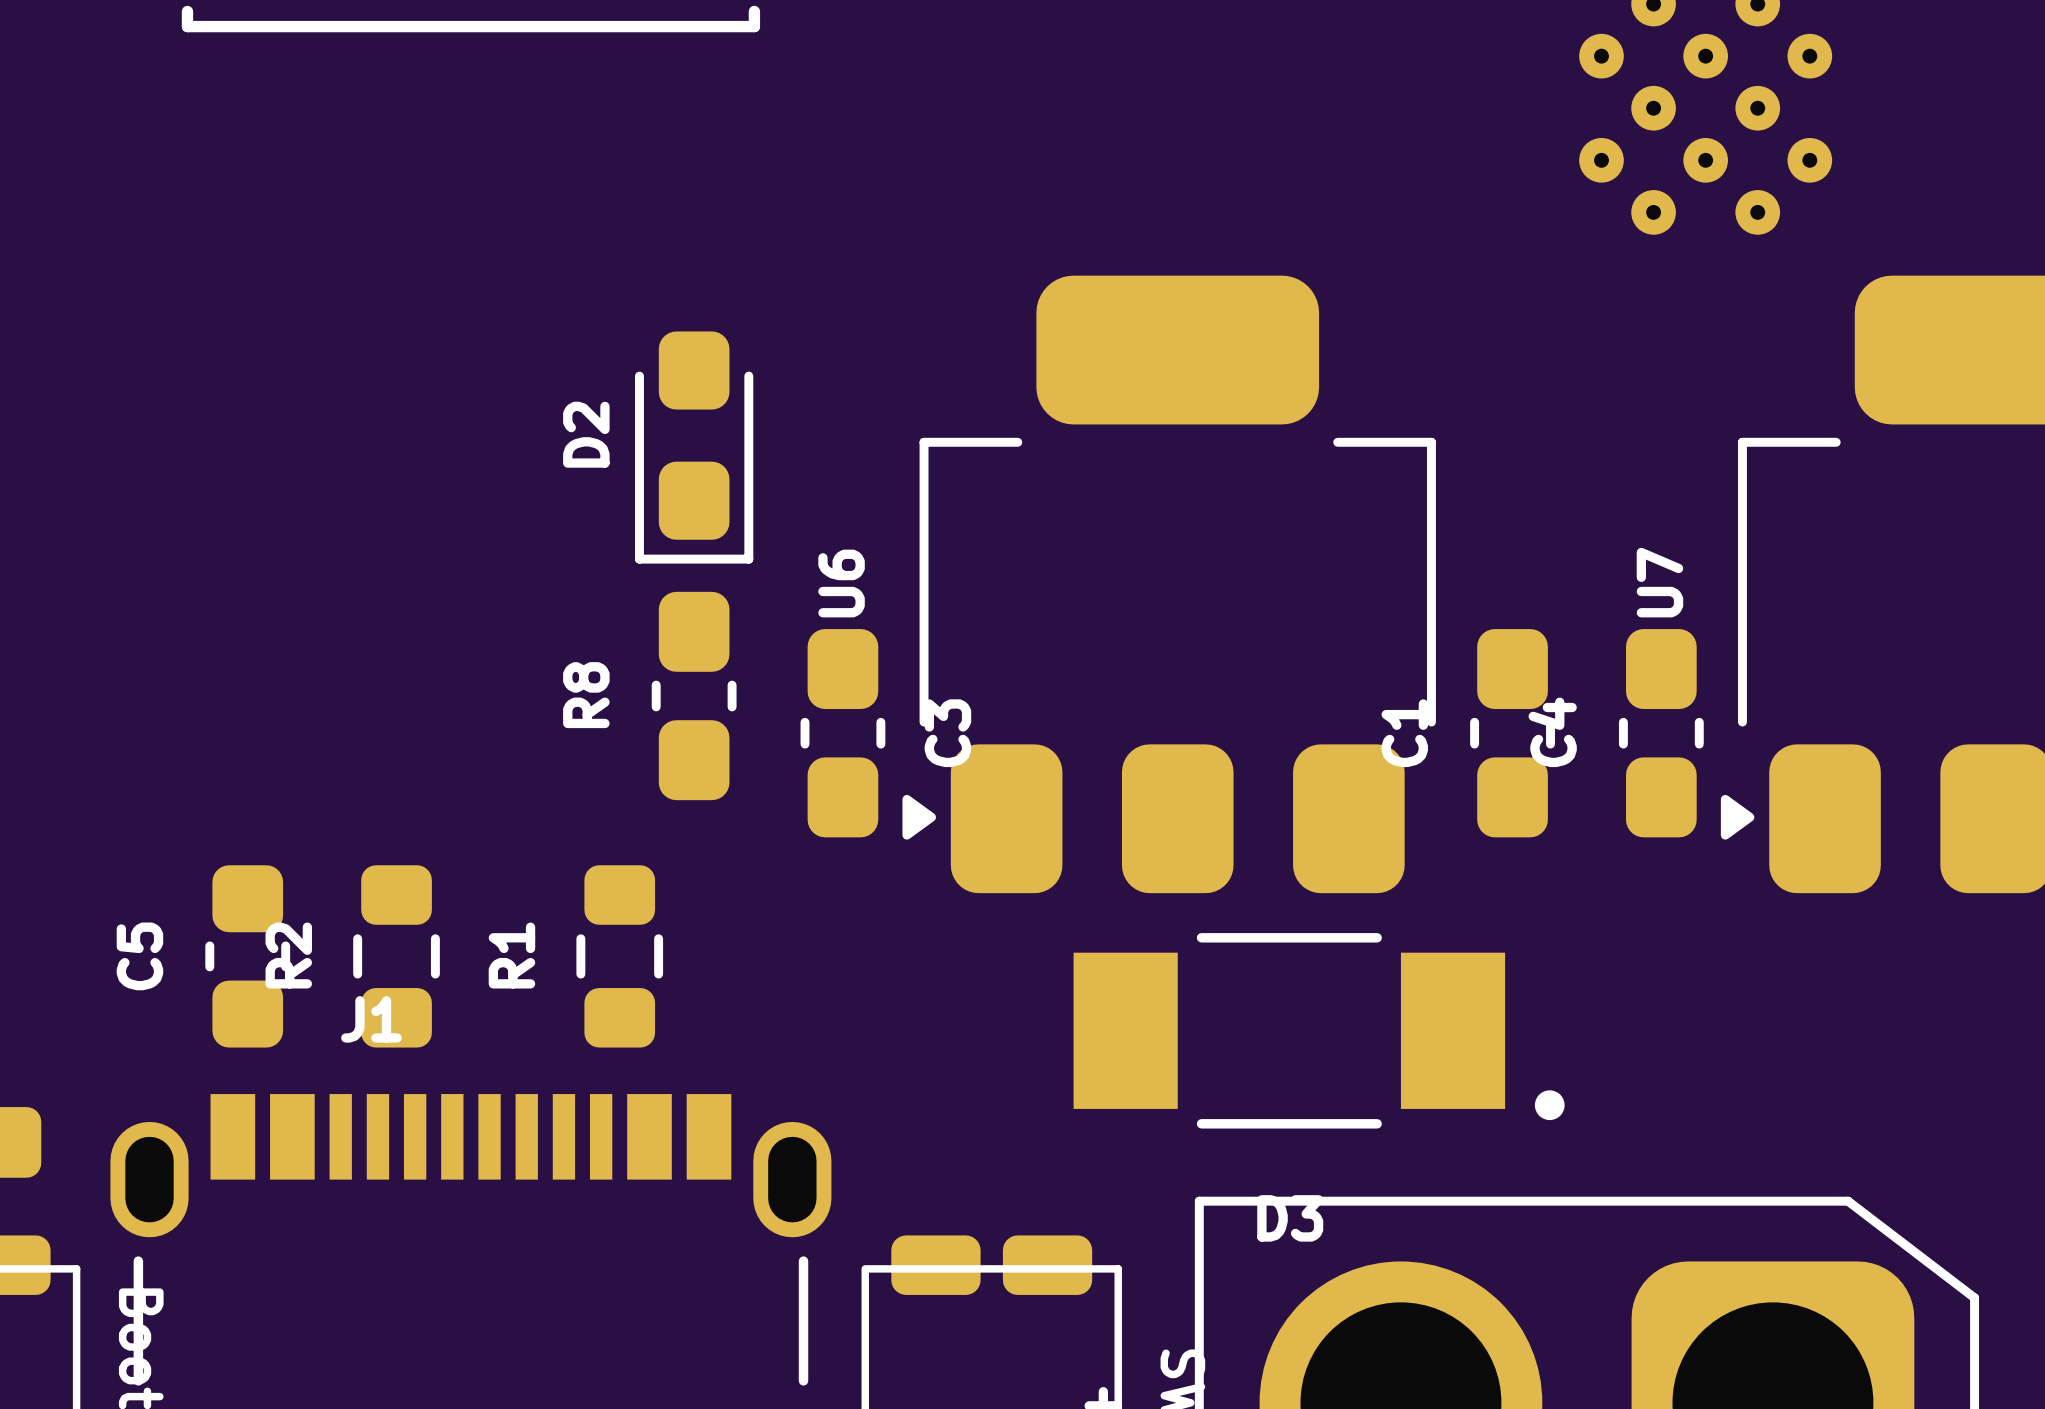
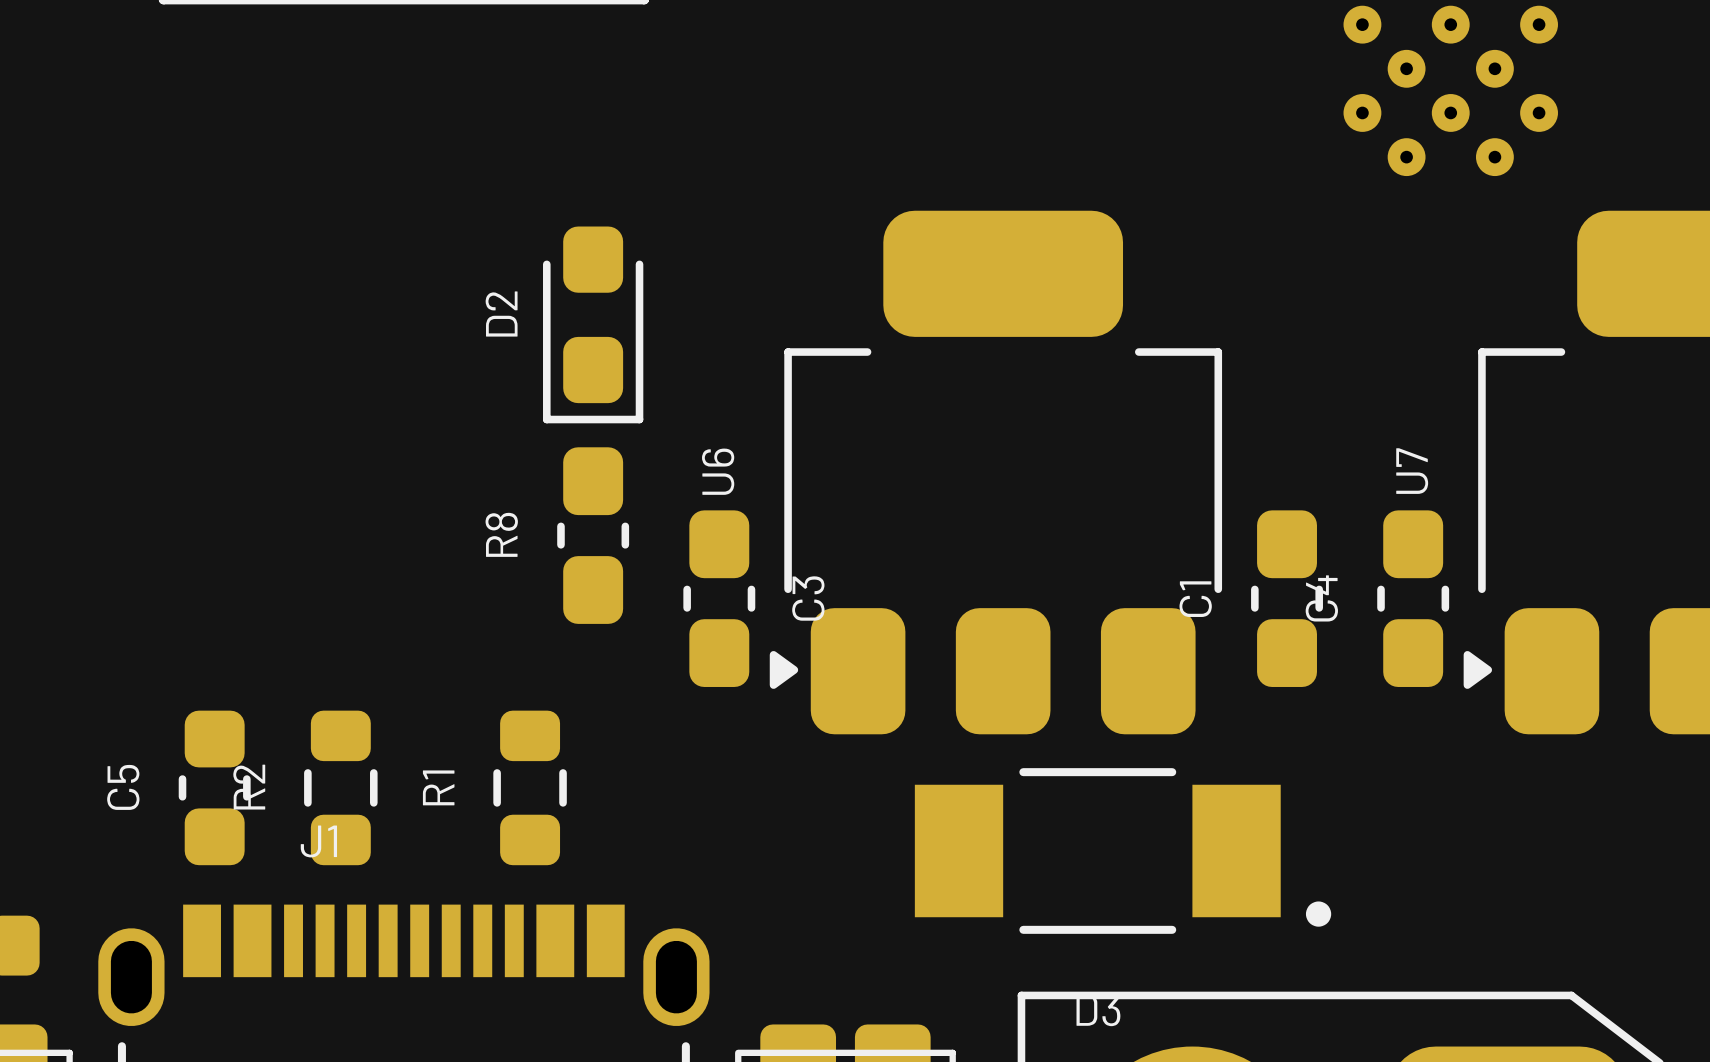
D2 position: (694, 447) -> (593, 324)
R8 position: (694, 696) -> (593, 535)

